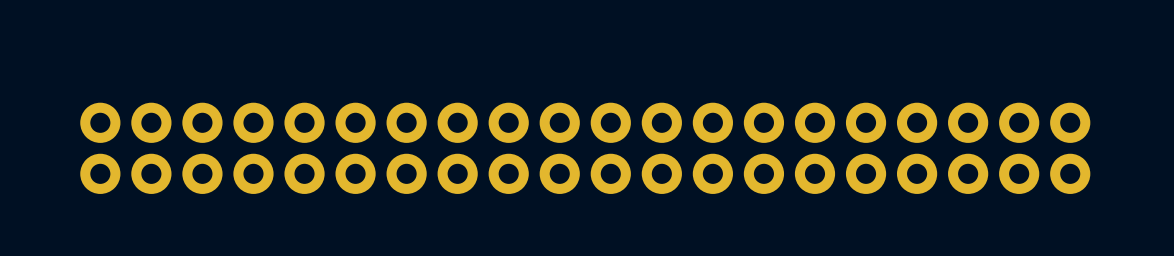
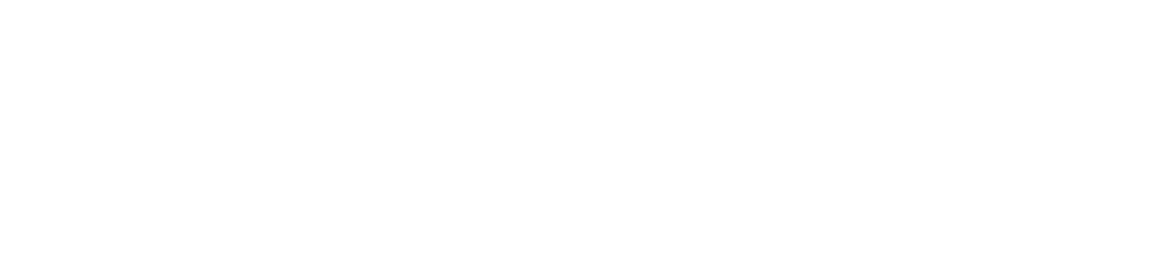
part: (585, 148) -> none

